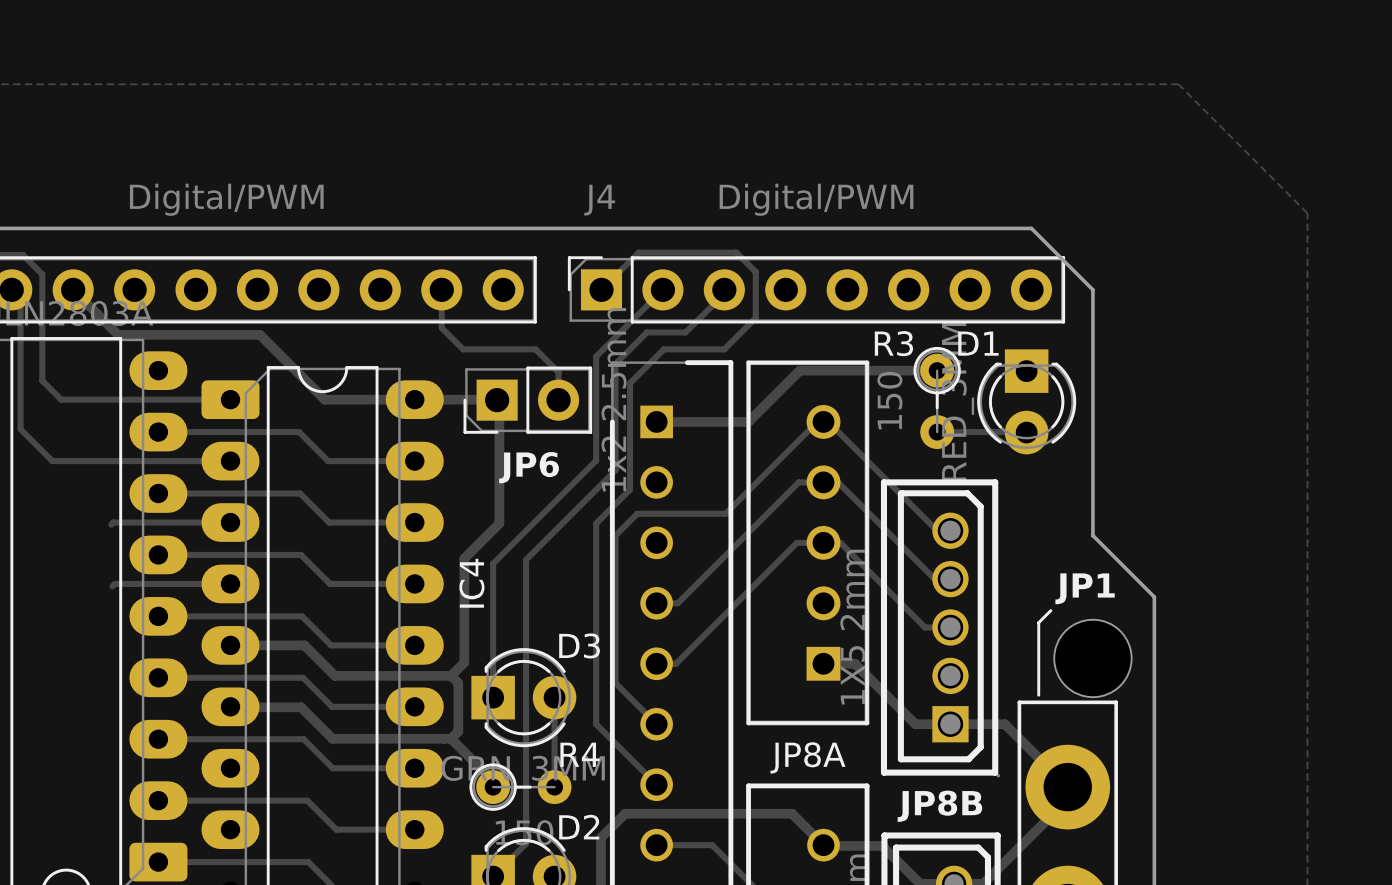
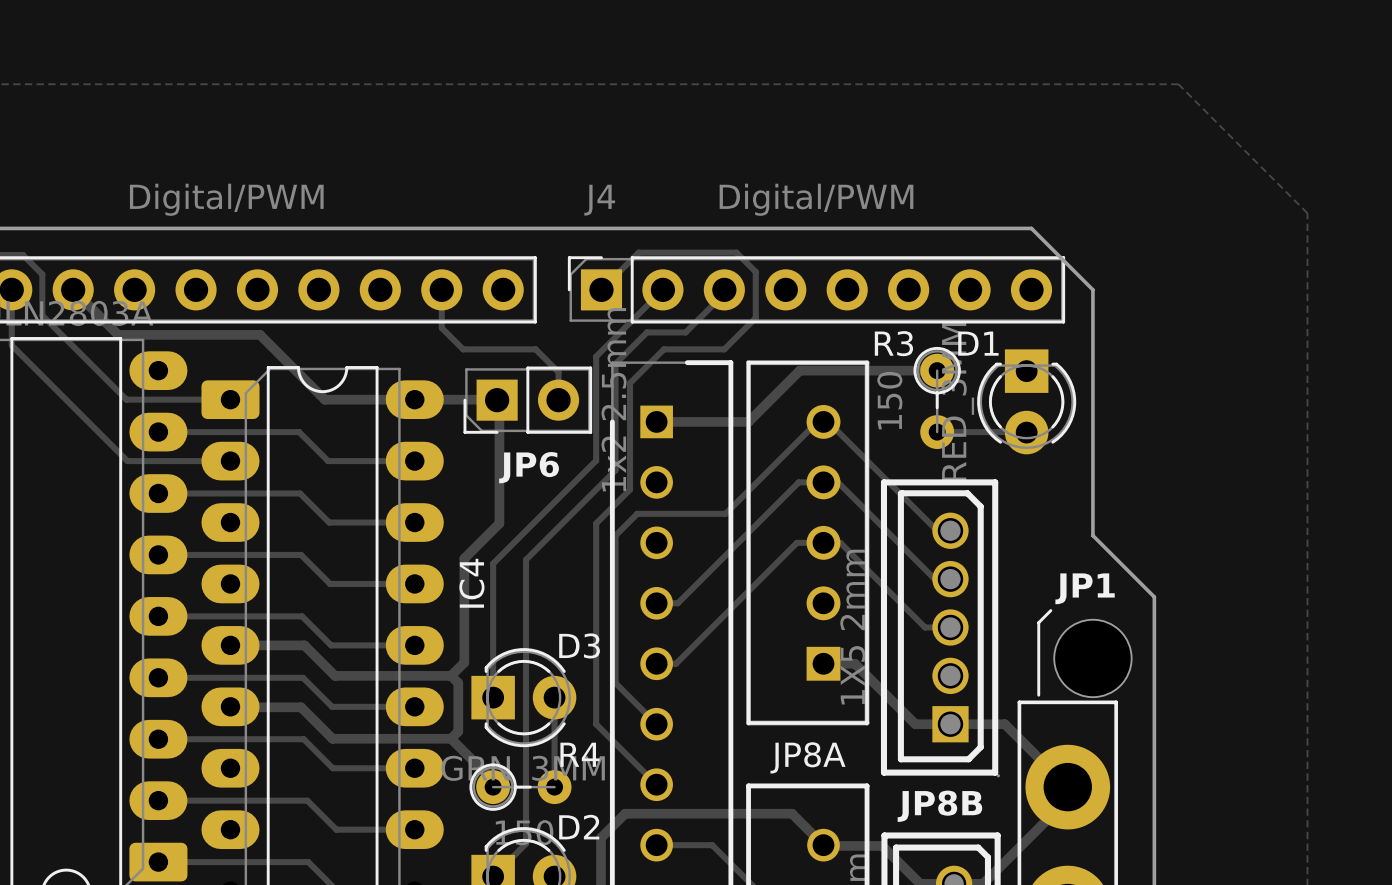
track: (11, 289) (20, 298) (20, 429) (52, 461) (127, 461) -> (11, 289) (11, 345) (127, 461)
track: (42, 315) (42, 380) (61, 399) (126, 399) -> (42, 315) (126, 399)
track: (230, 522) (113, 522) (111, 524) -> none
track: (230, 583) (114, 583) (112, 586) -> none

